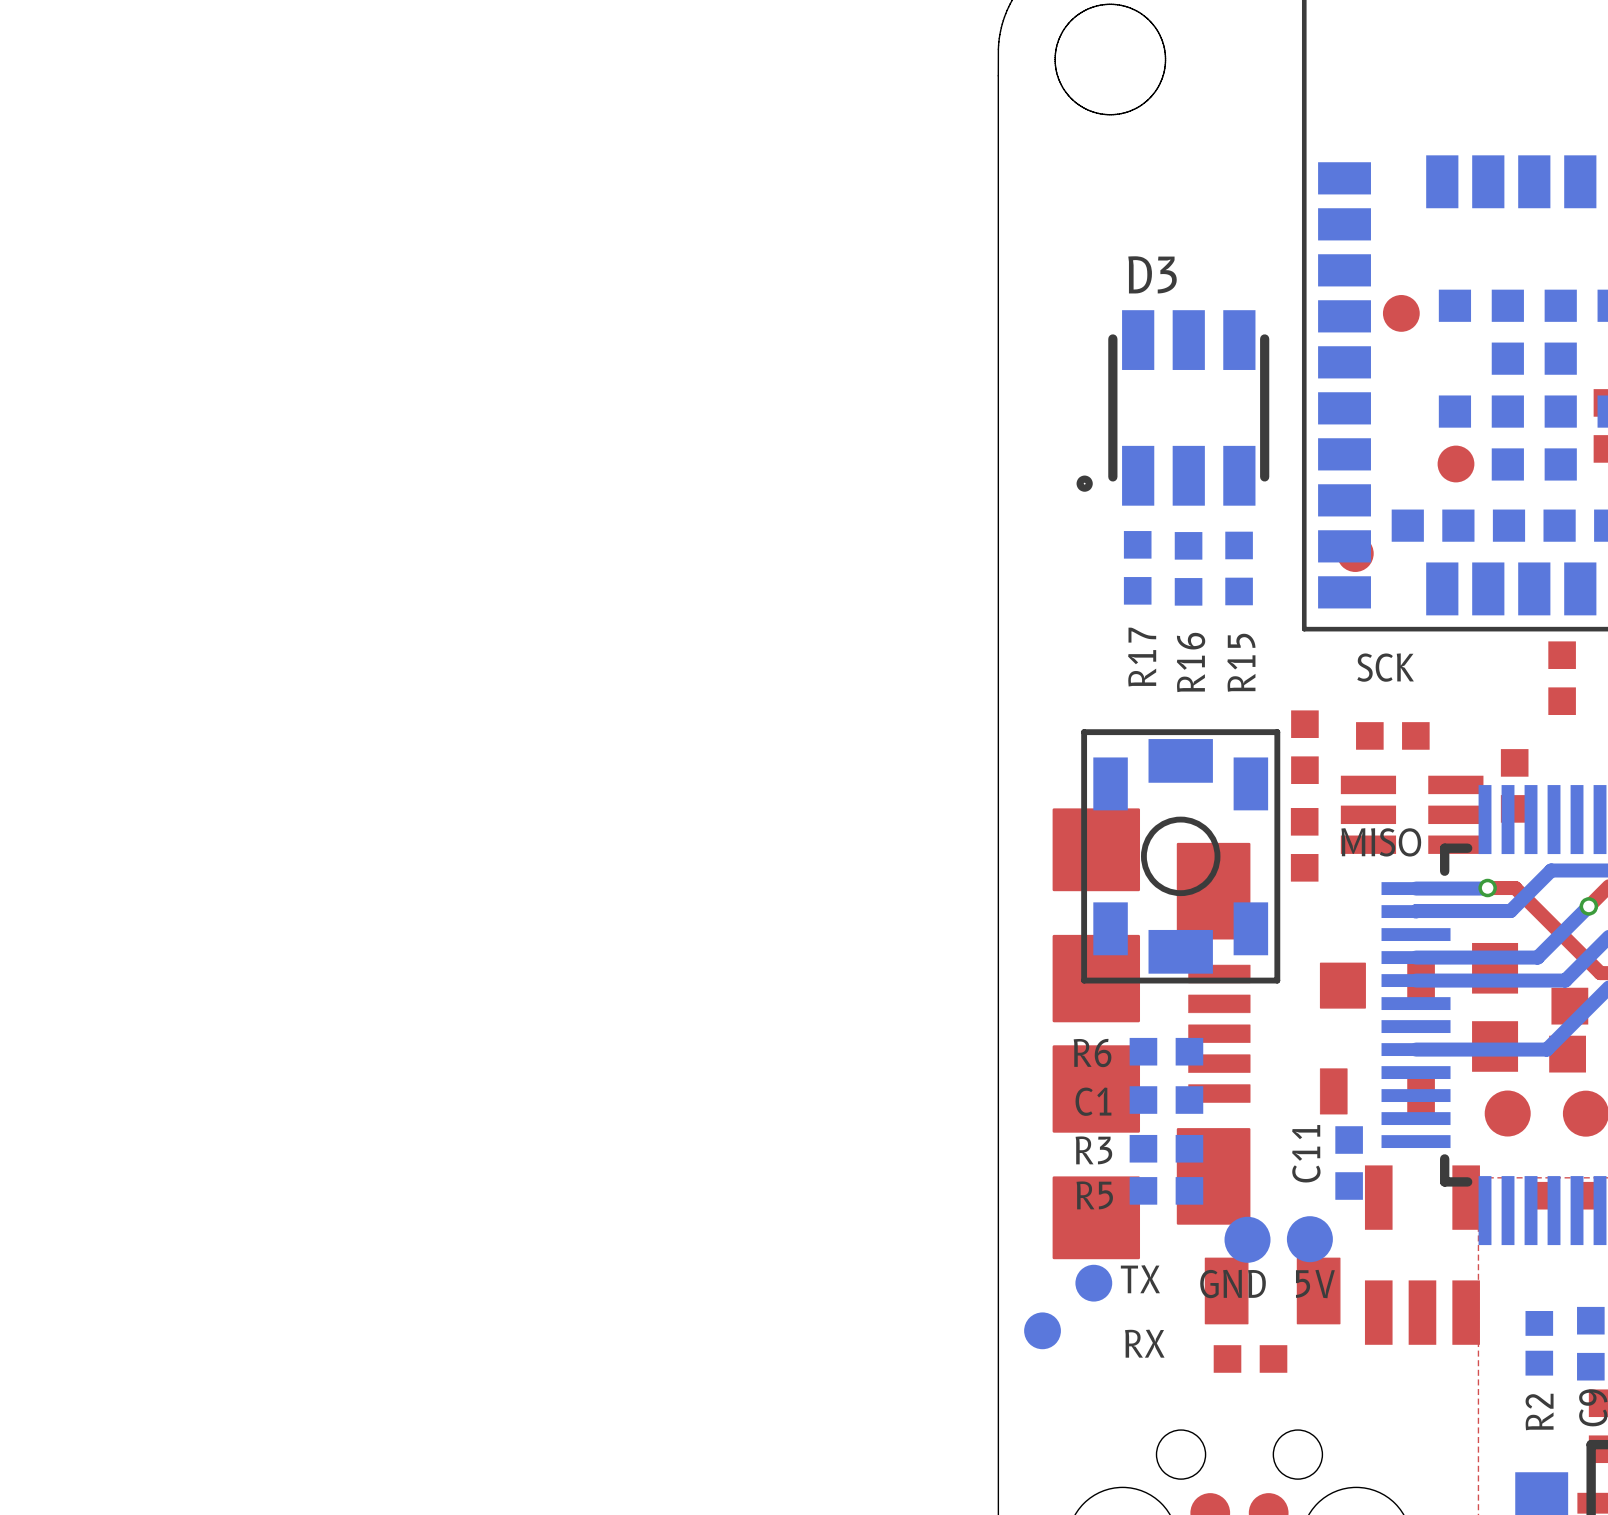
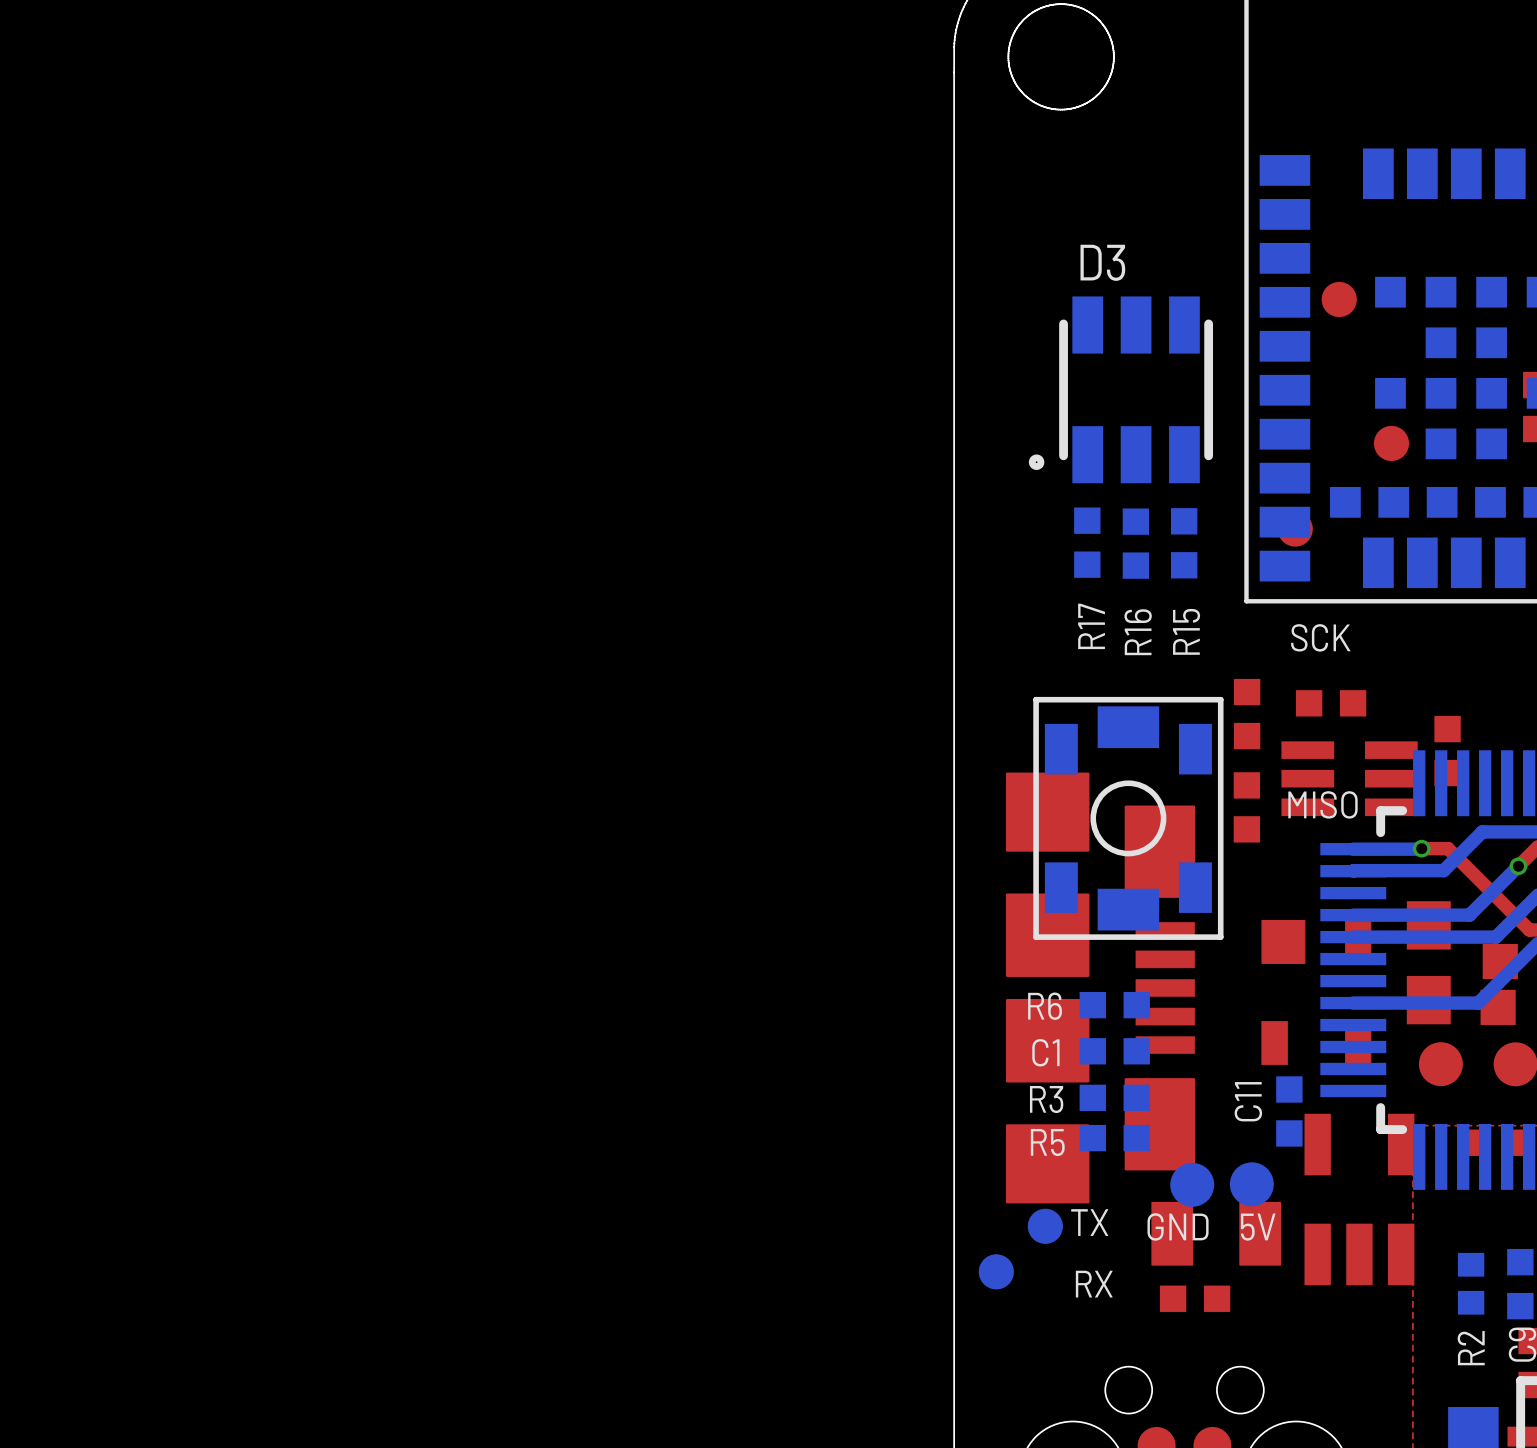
part: (1562, 678) -> none

